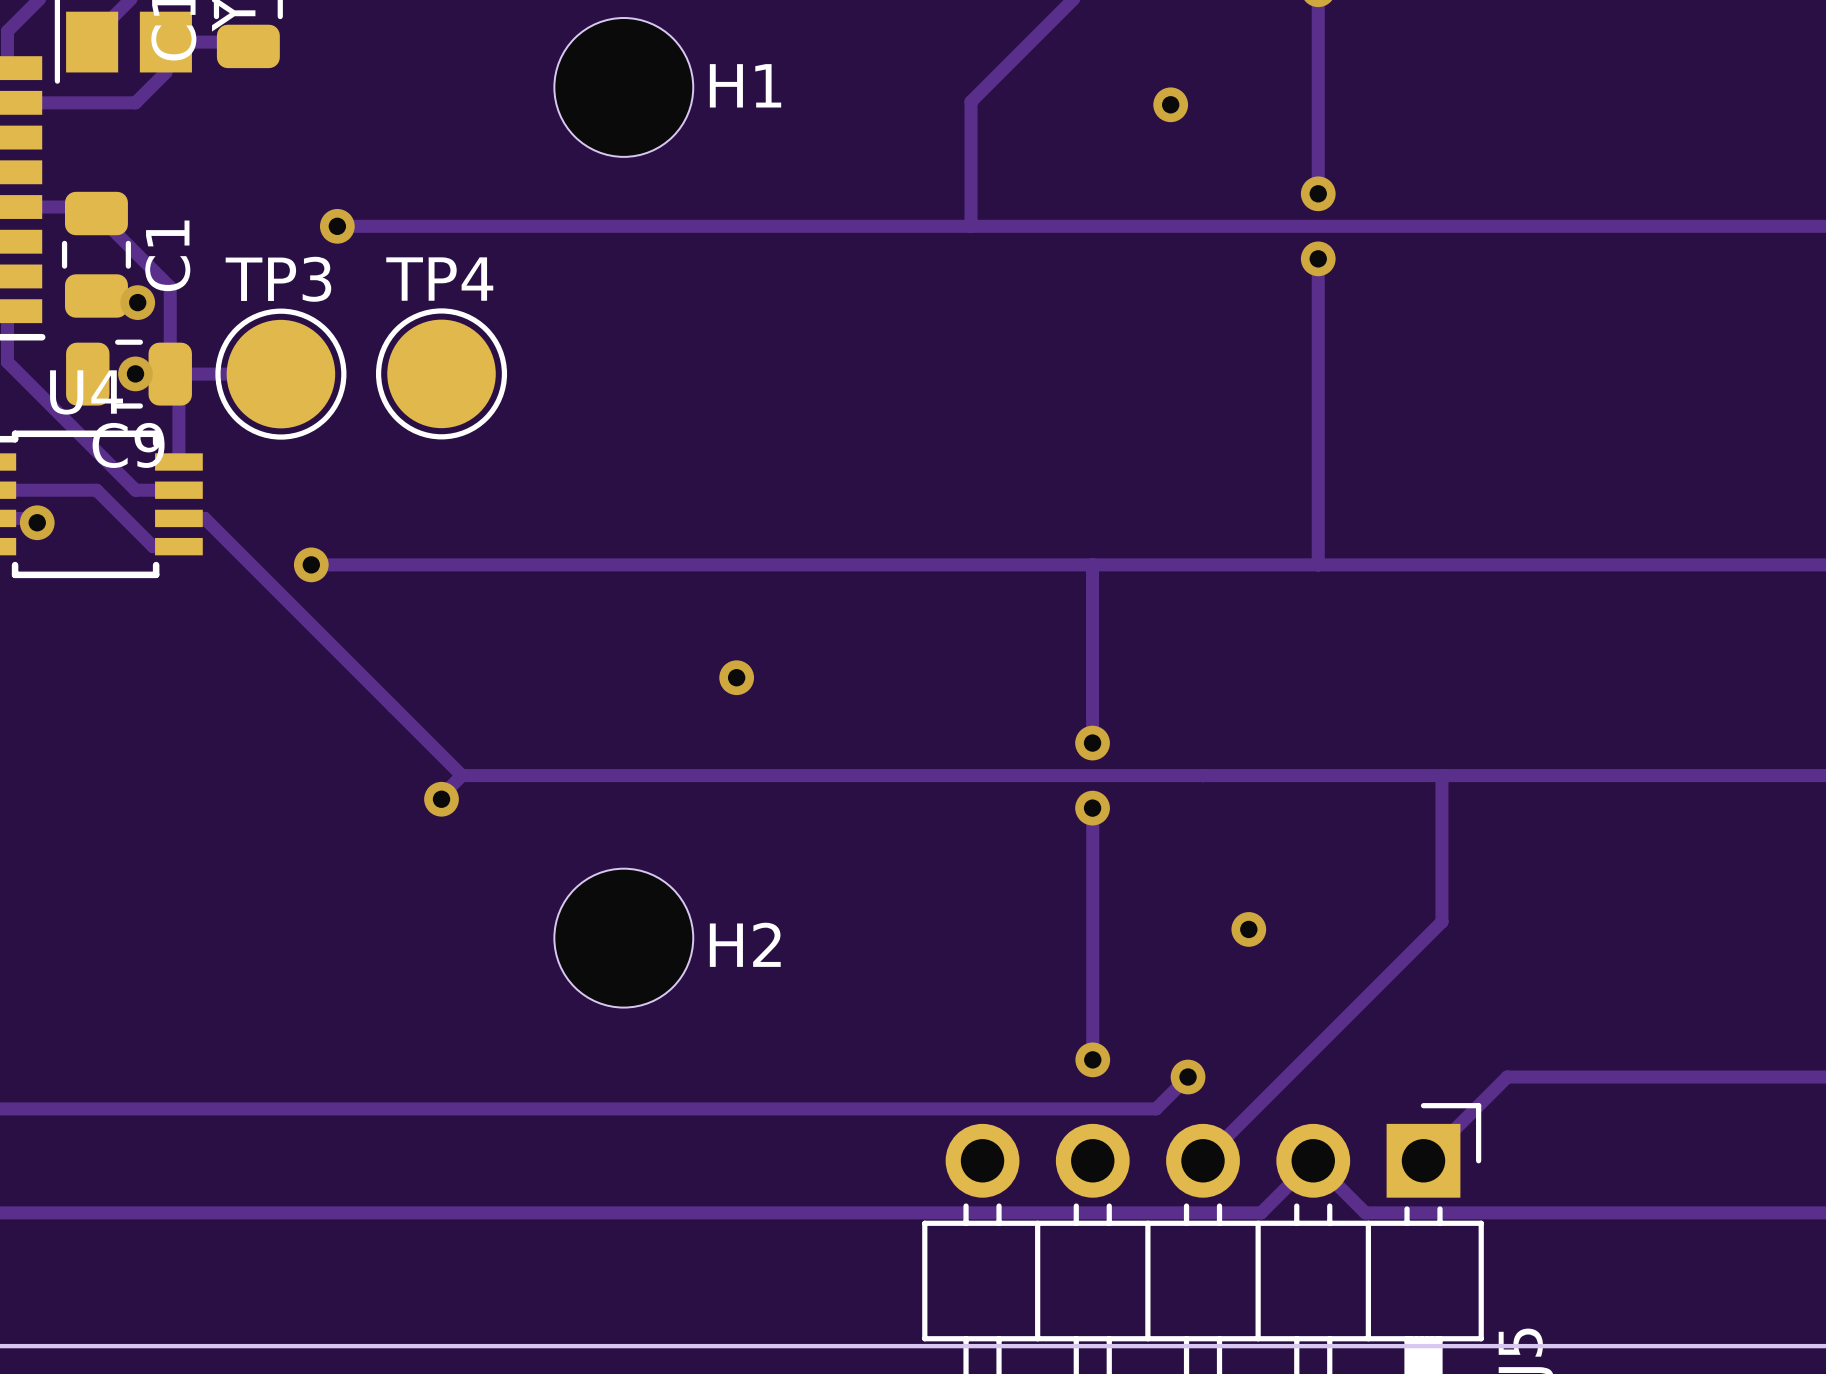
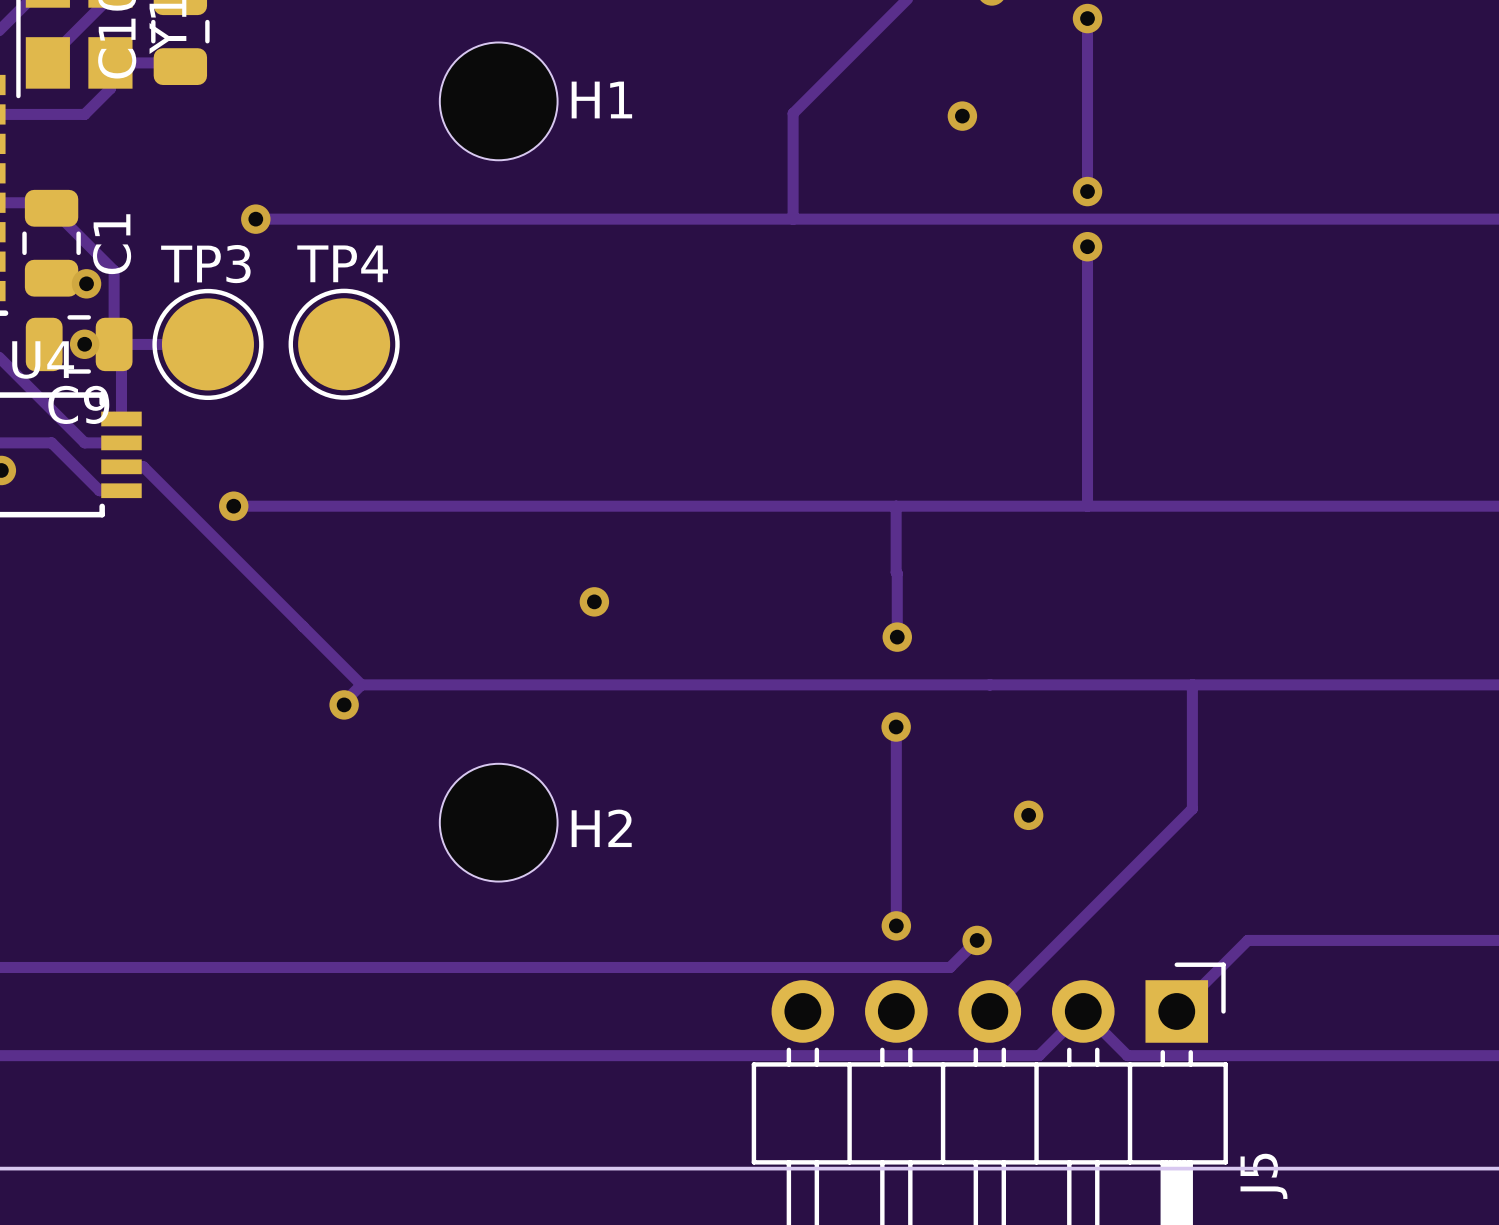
track: (1092, 642) (1092, 743) -> (896, 572) (897, 637)
via position: (1092, 743) -> (897, 637)
via position: (1092, 808) -> (896, 726)

